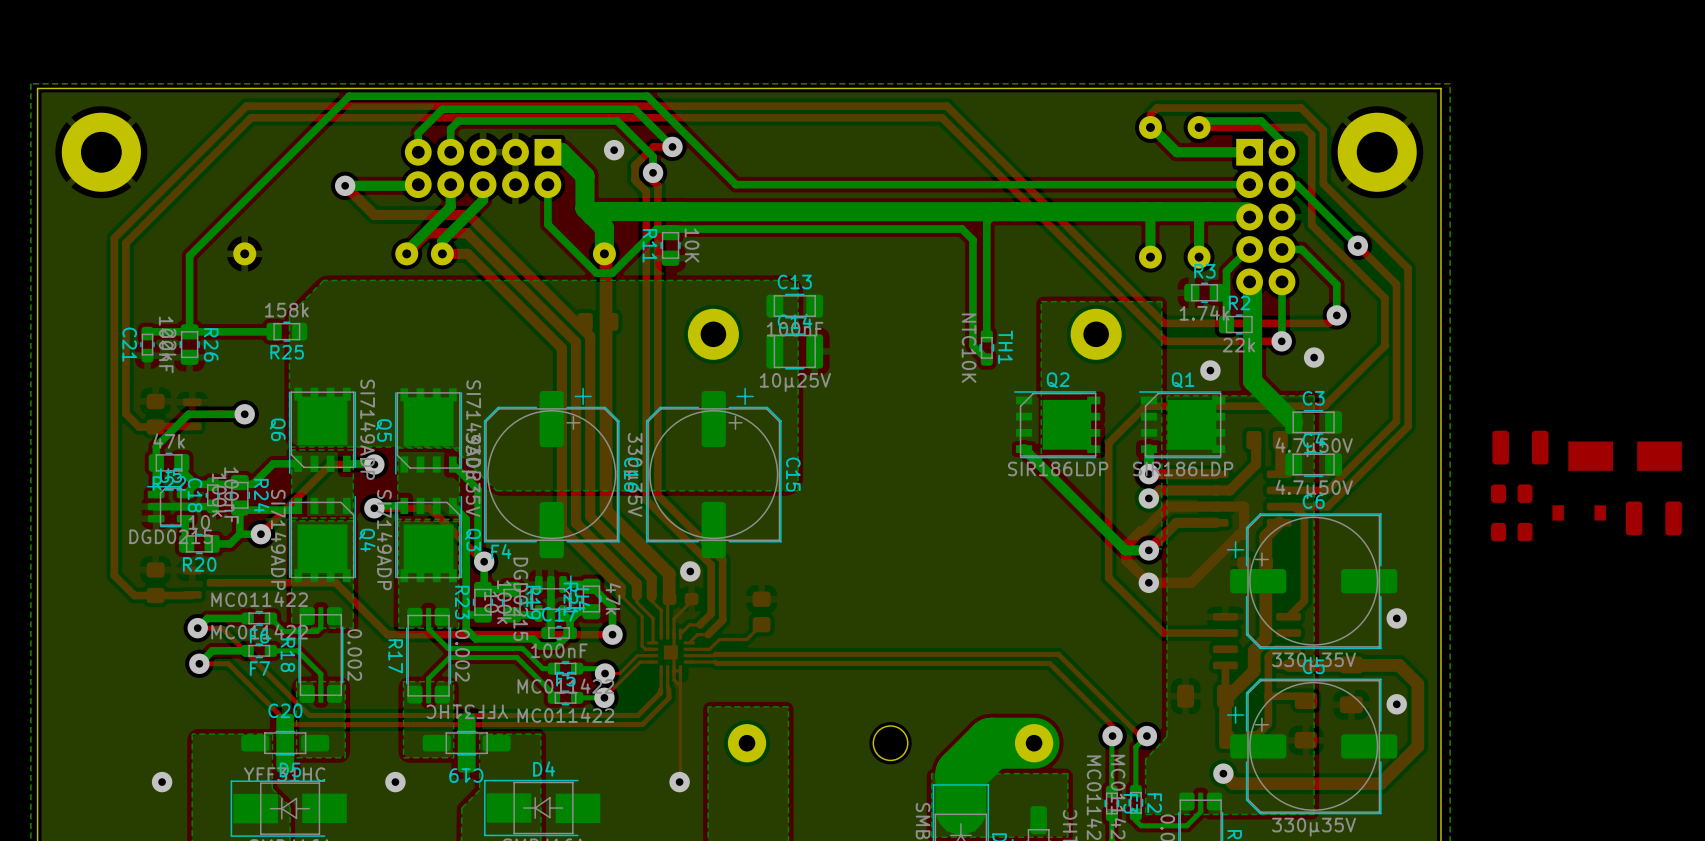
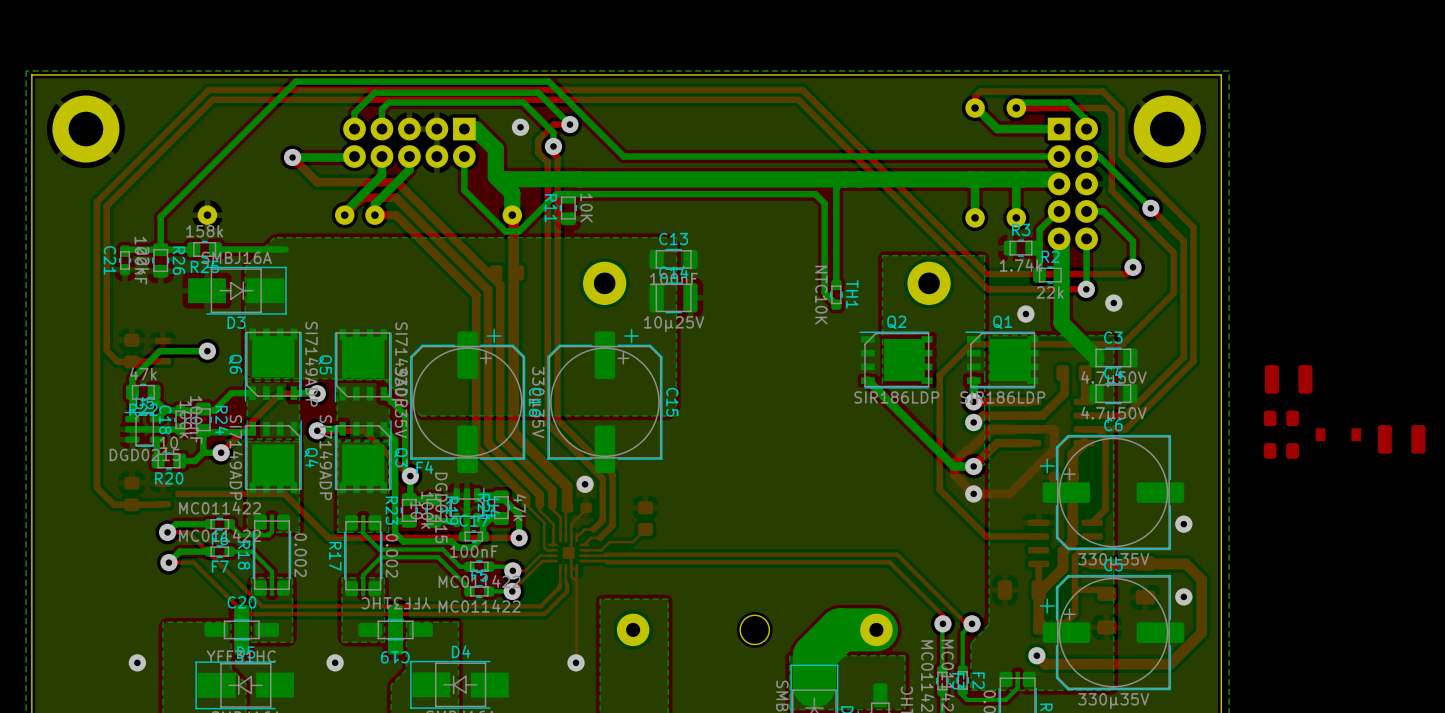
bottom track: (189, 294) (189, 331) -> none
bottom track: none -> (193, 249) (125, 249)
bottom track: none -> (285, 249) (215, 249)
bottom track: (273, 331) (147, 331) -> none
R25 position: (286, 331) -> (204, 249)
D3: none -> SMBJ16A (237, 290)
C21 position: (147, 344) -> (125, 260)
R26 position: (189, 344) -> (160, 260)
part: (1625, 456) -> none

